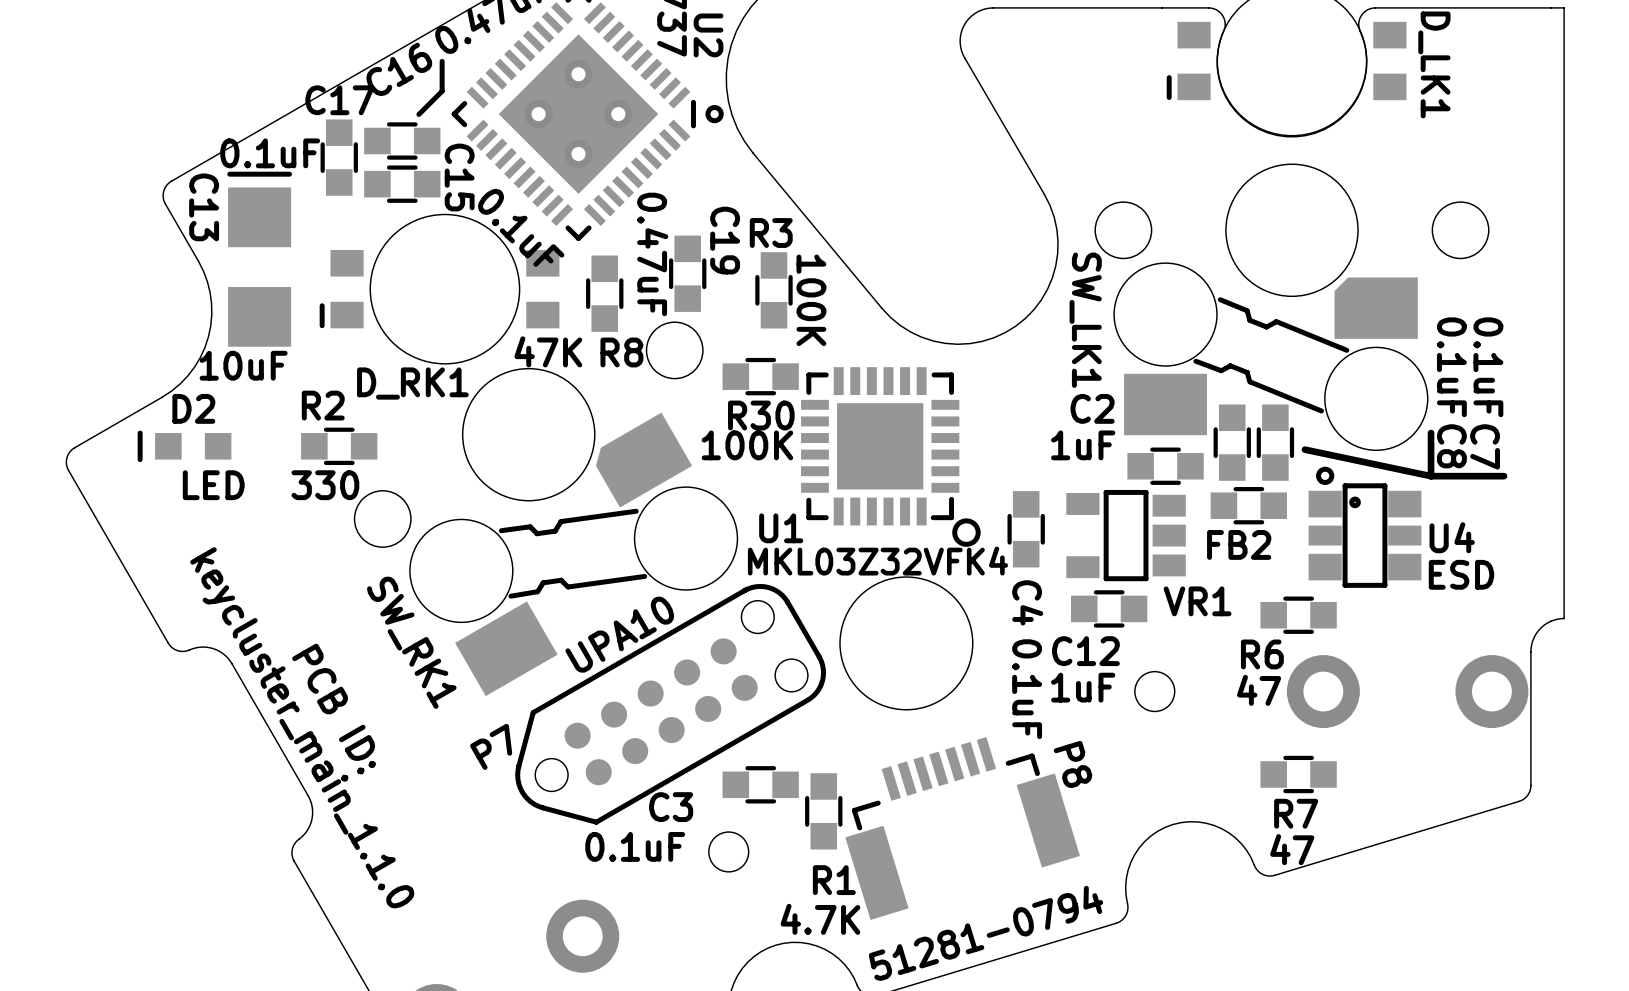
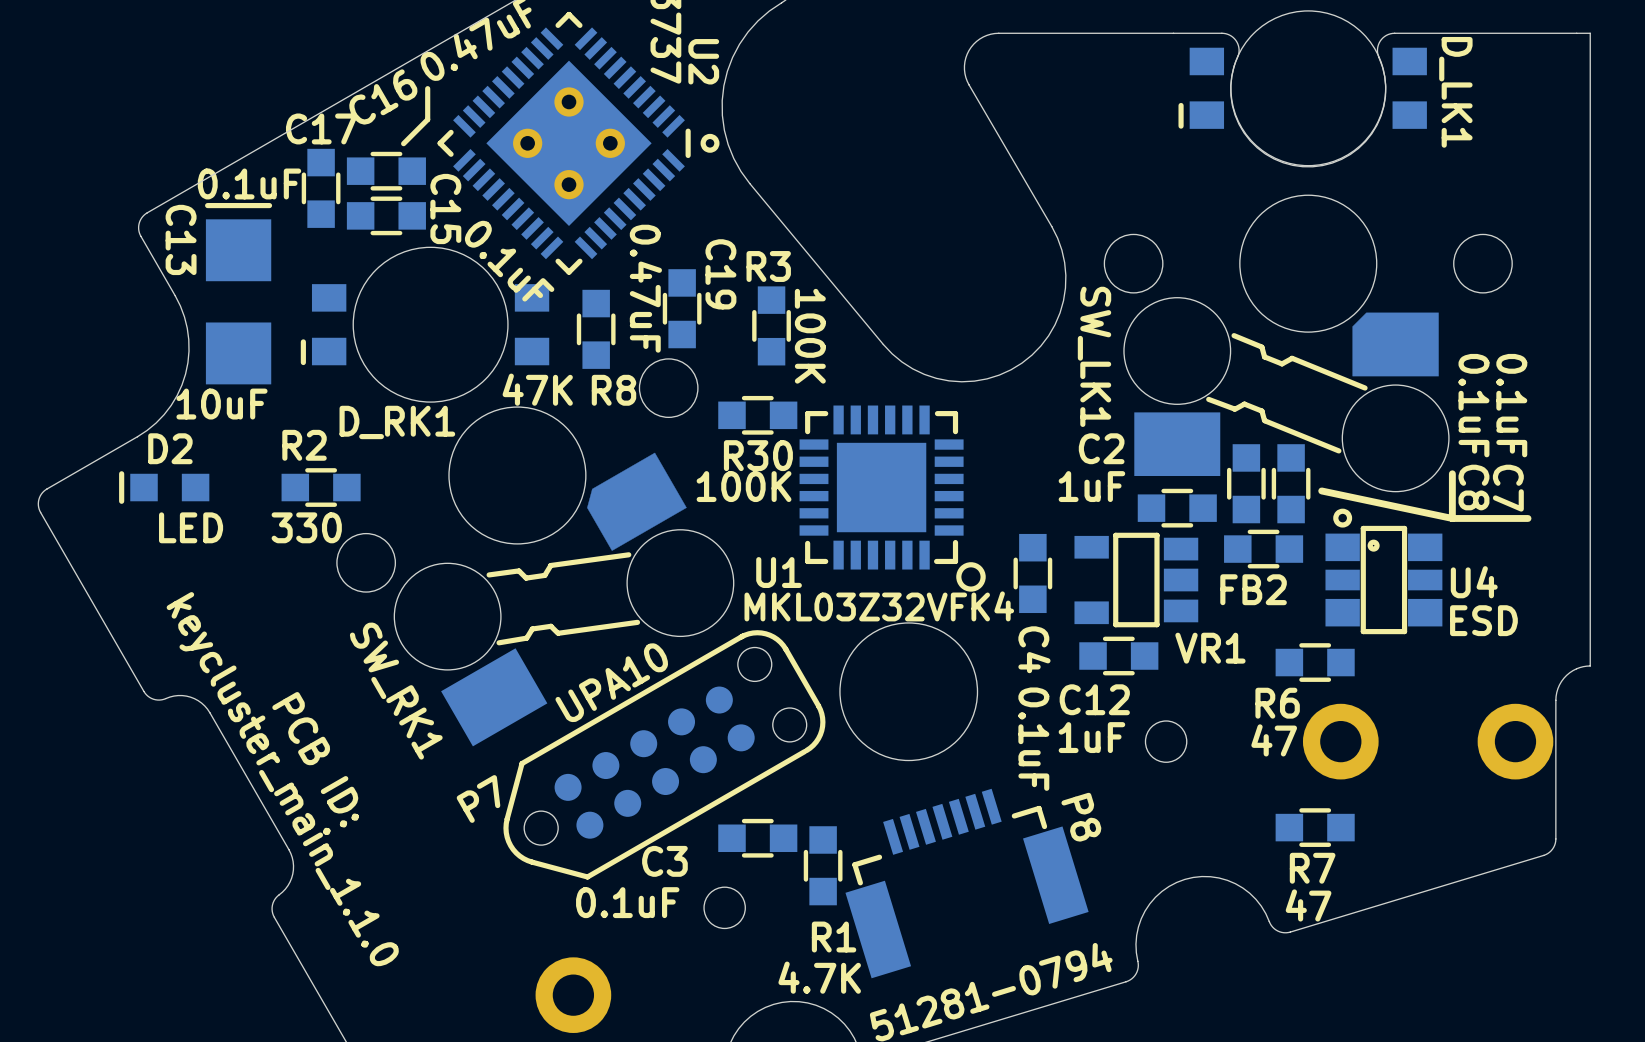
D2 footprint: [137, 430, 232, 463] -> [119, 471, 210, 504]

